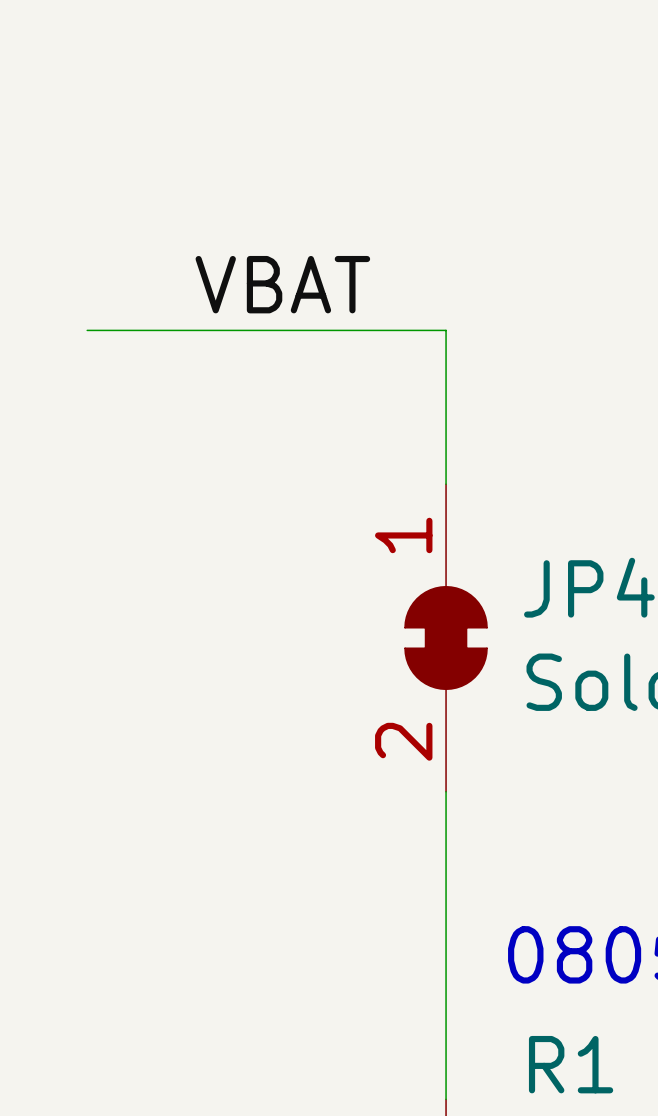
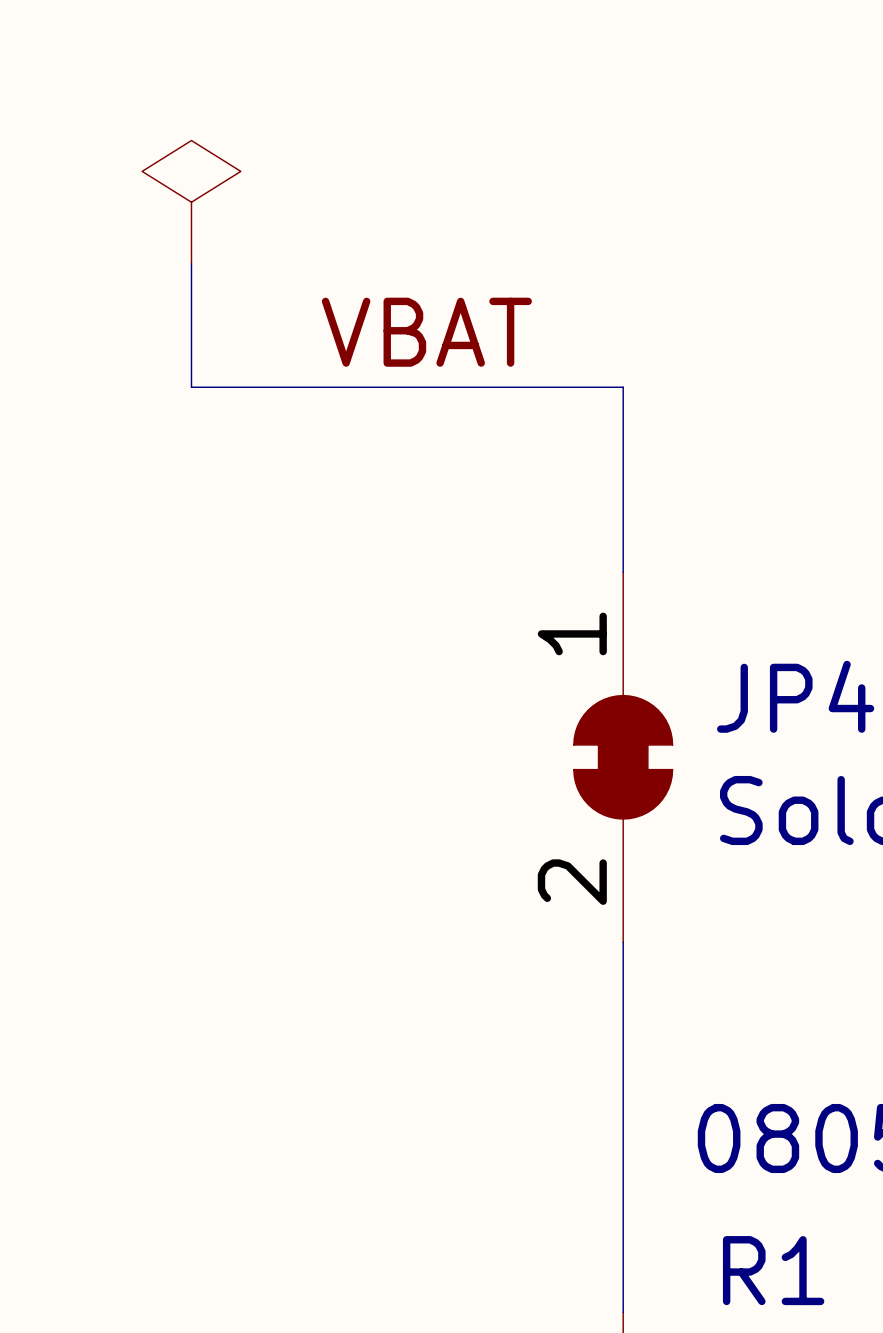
power symbol: none -> (191, 202)
wire: none -> (191, 263) (191, 387)

